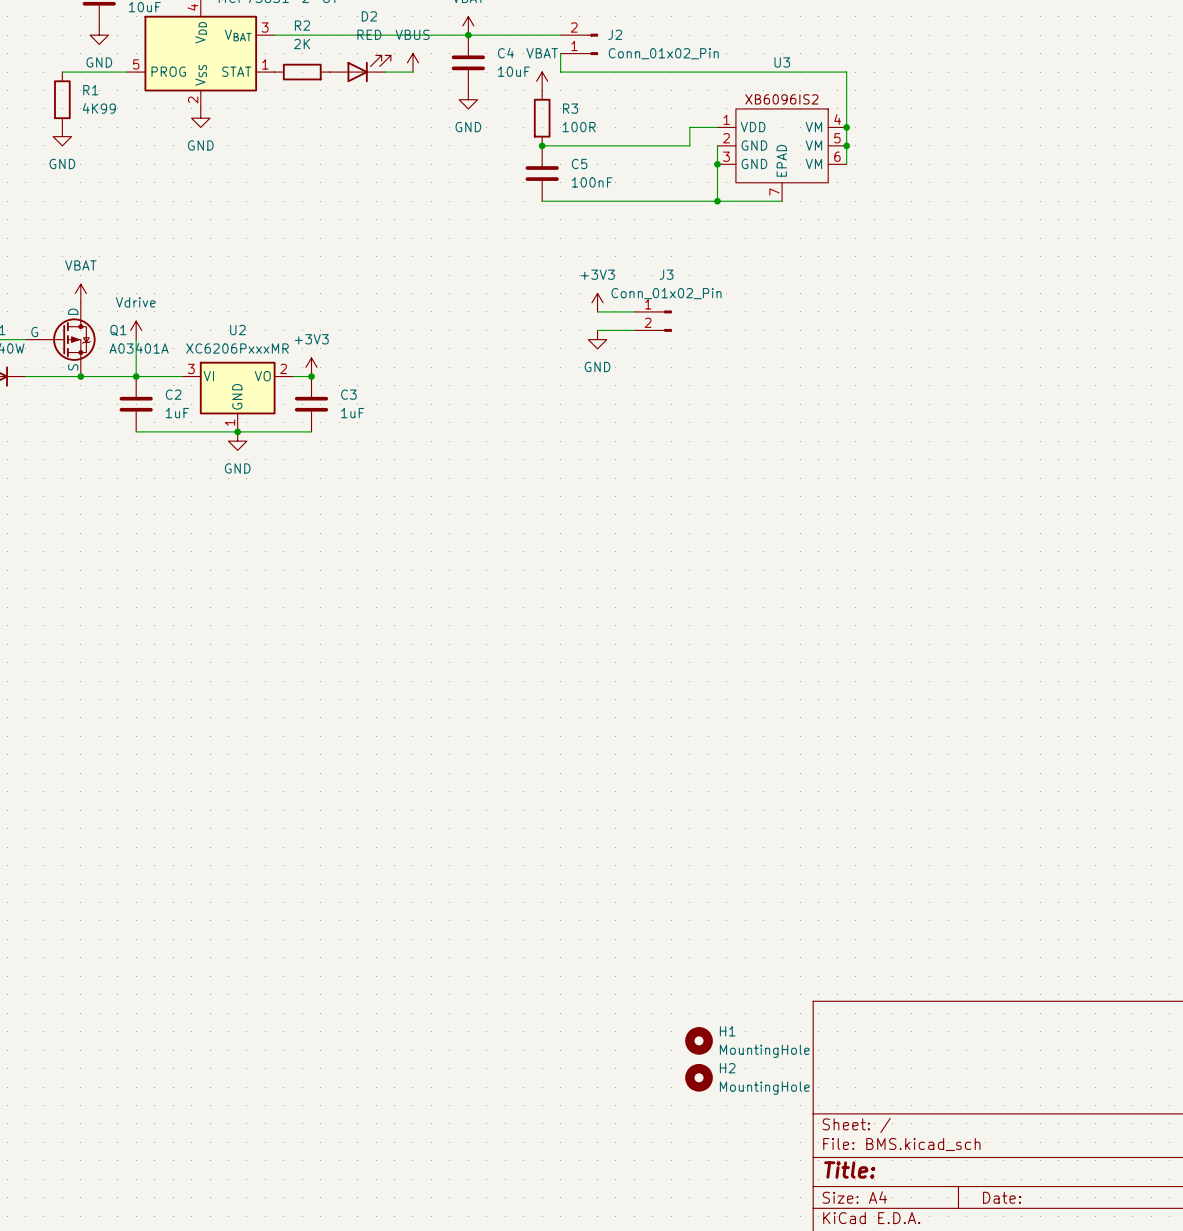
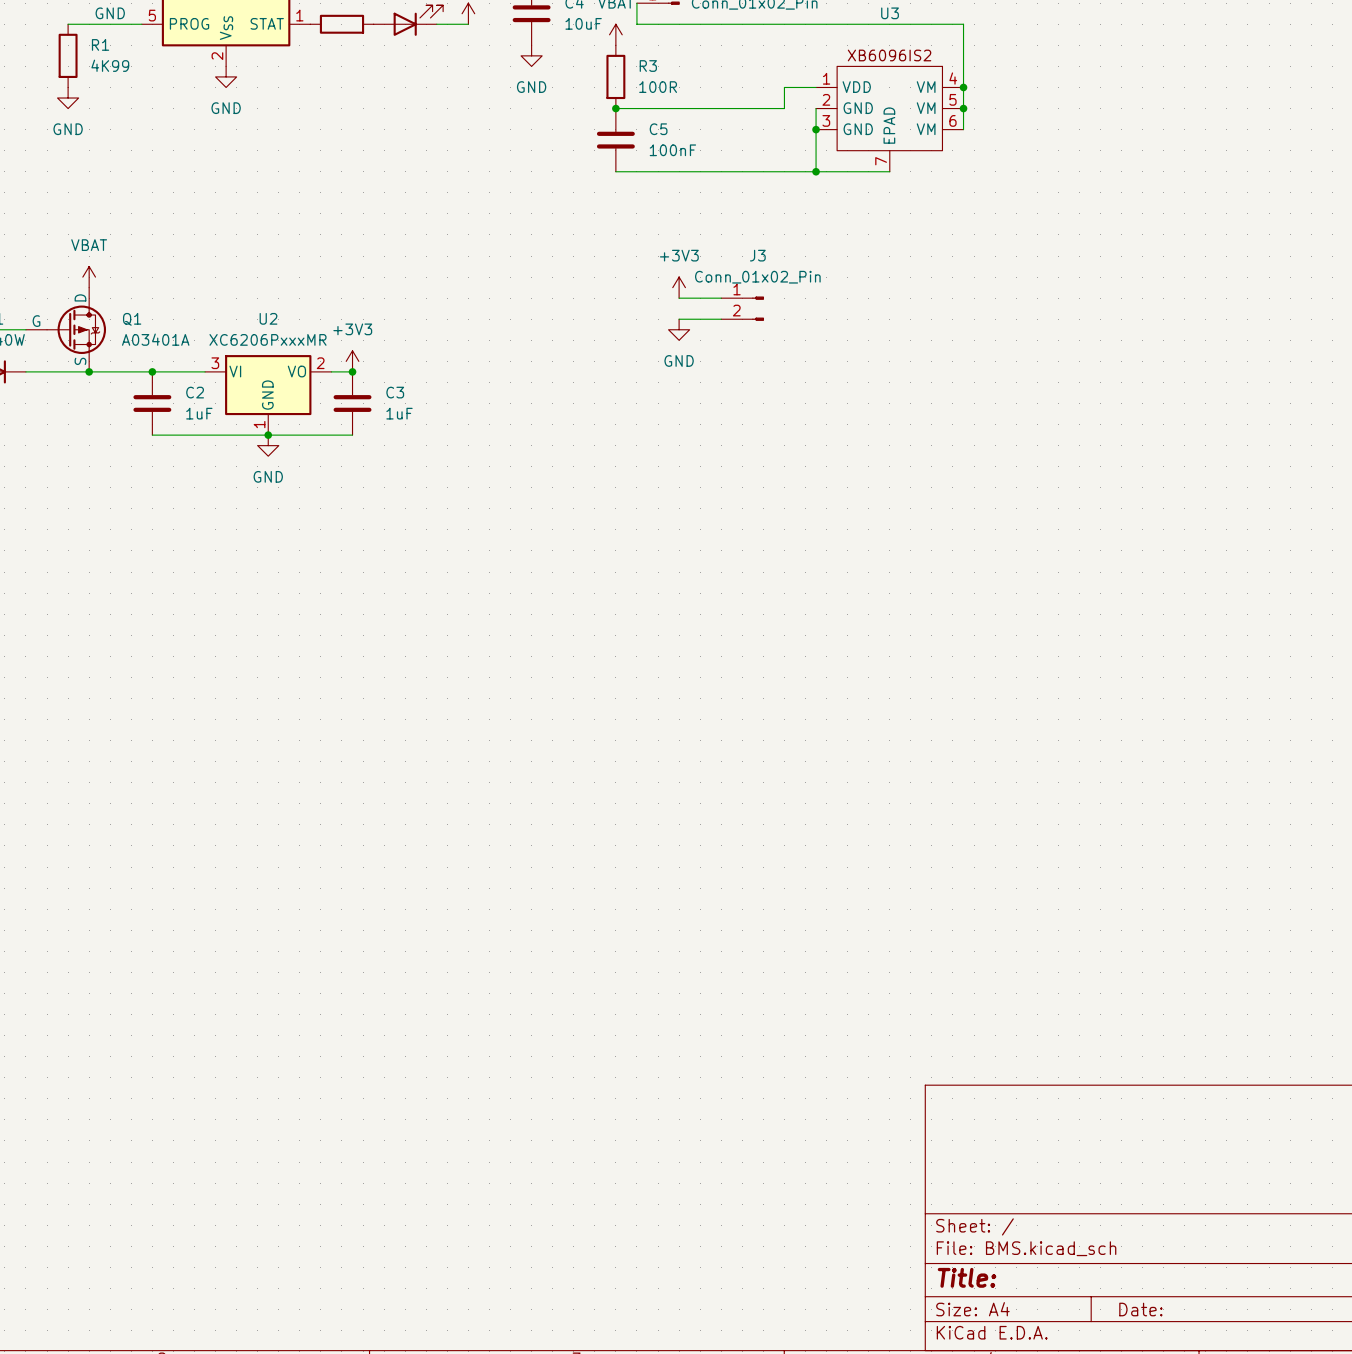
power symbol: Vdrive (136, 330) -> none
wire: (136, 339) (136, 376) -> none
H1: MountingHole (699, 1040) -> none
H2: MountingHole (699, 1077) -> none

